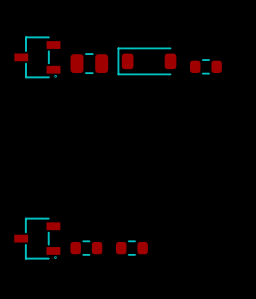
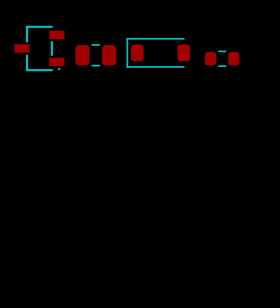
part: (37, 238) -> none
part: (86, 248) -> none
part: (131, 248) -> none

